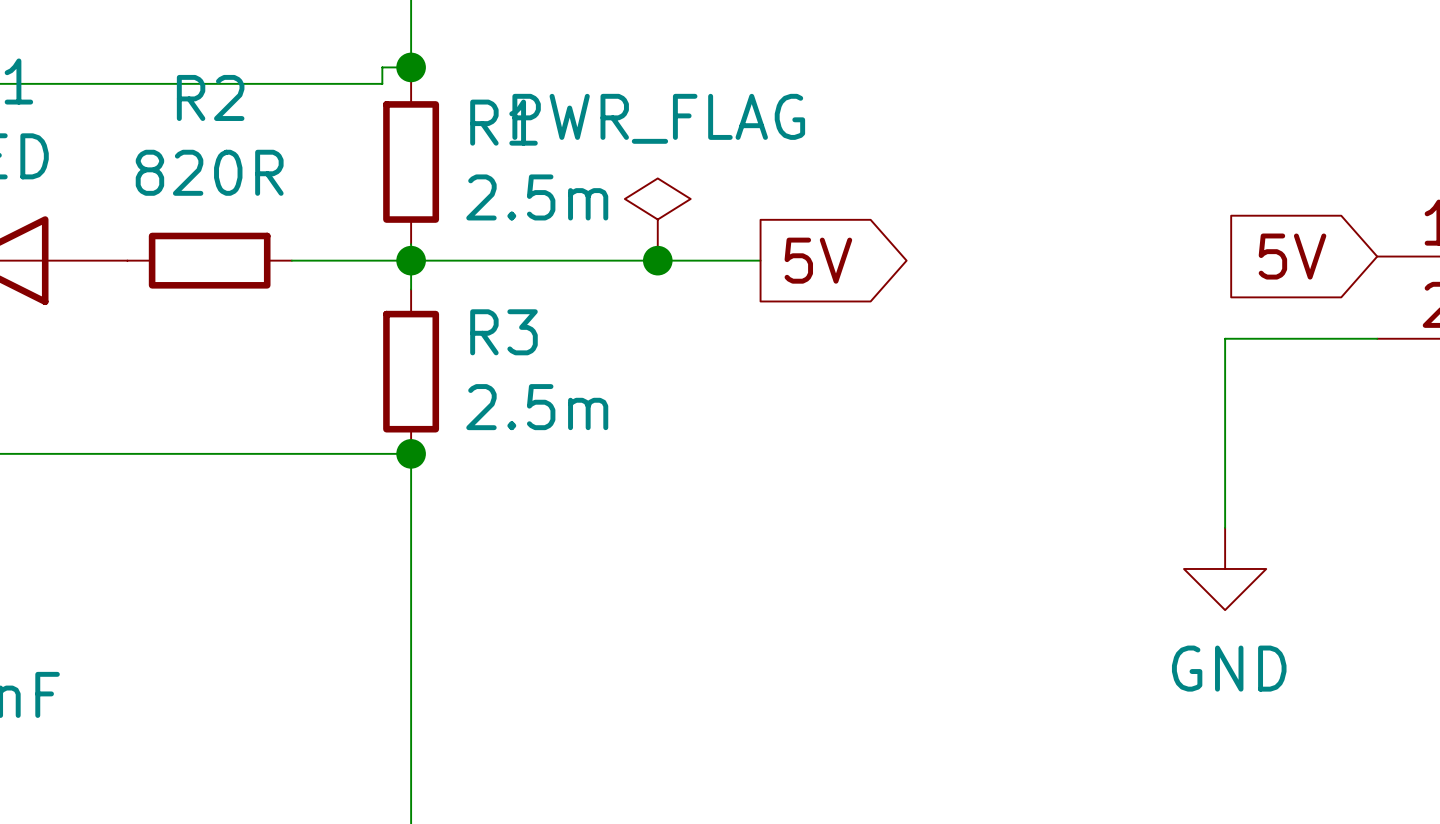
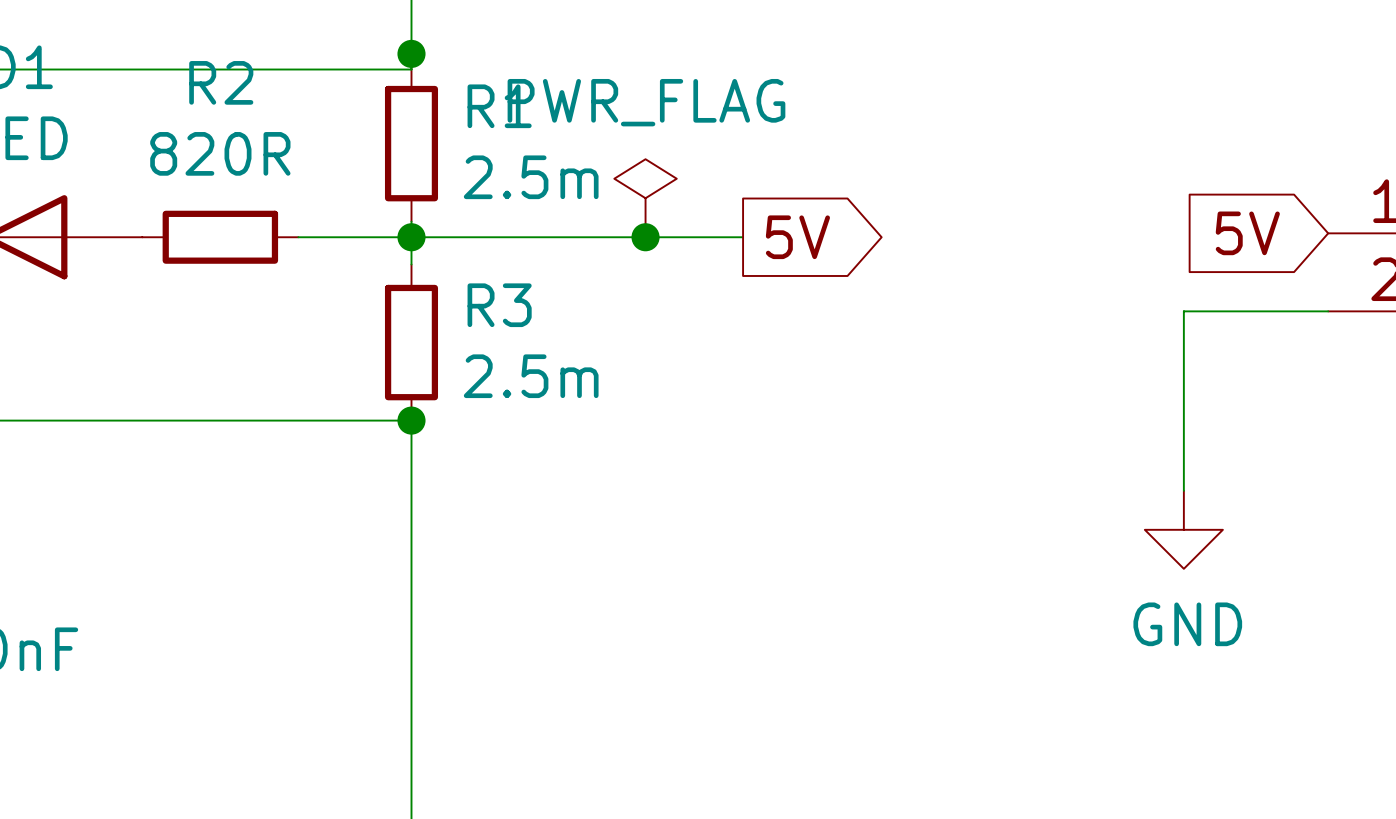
wire: (411, 67) (382, 67) (382, 83) -> (411, 65) (411, 69) (384, 69)

